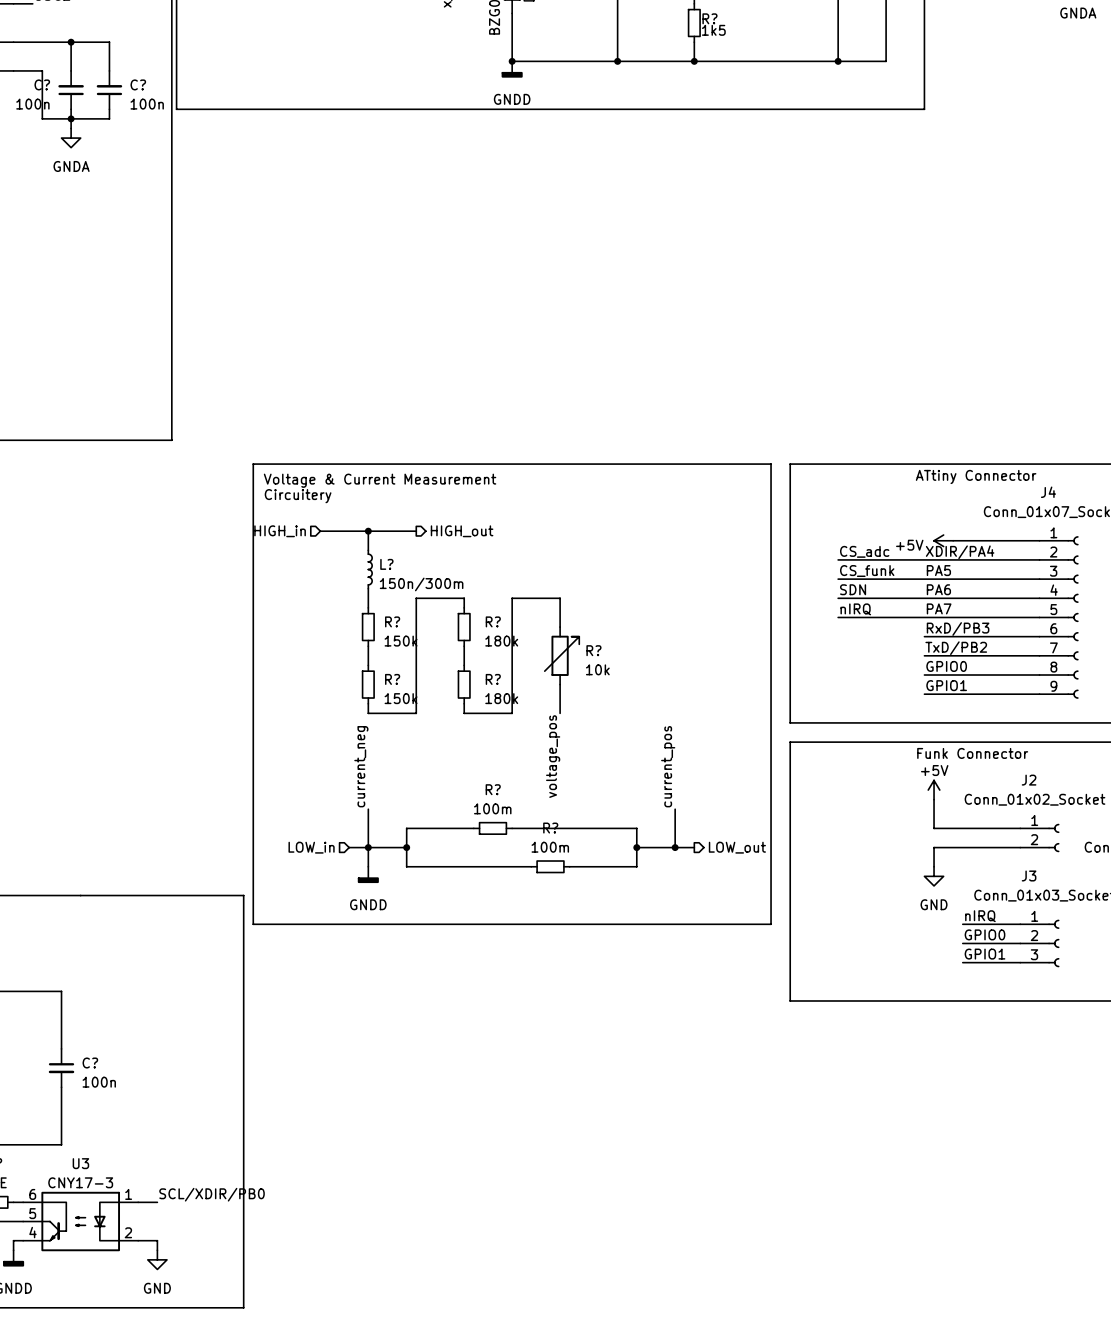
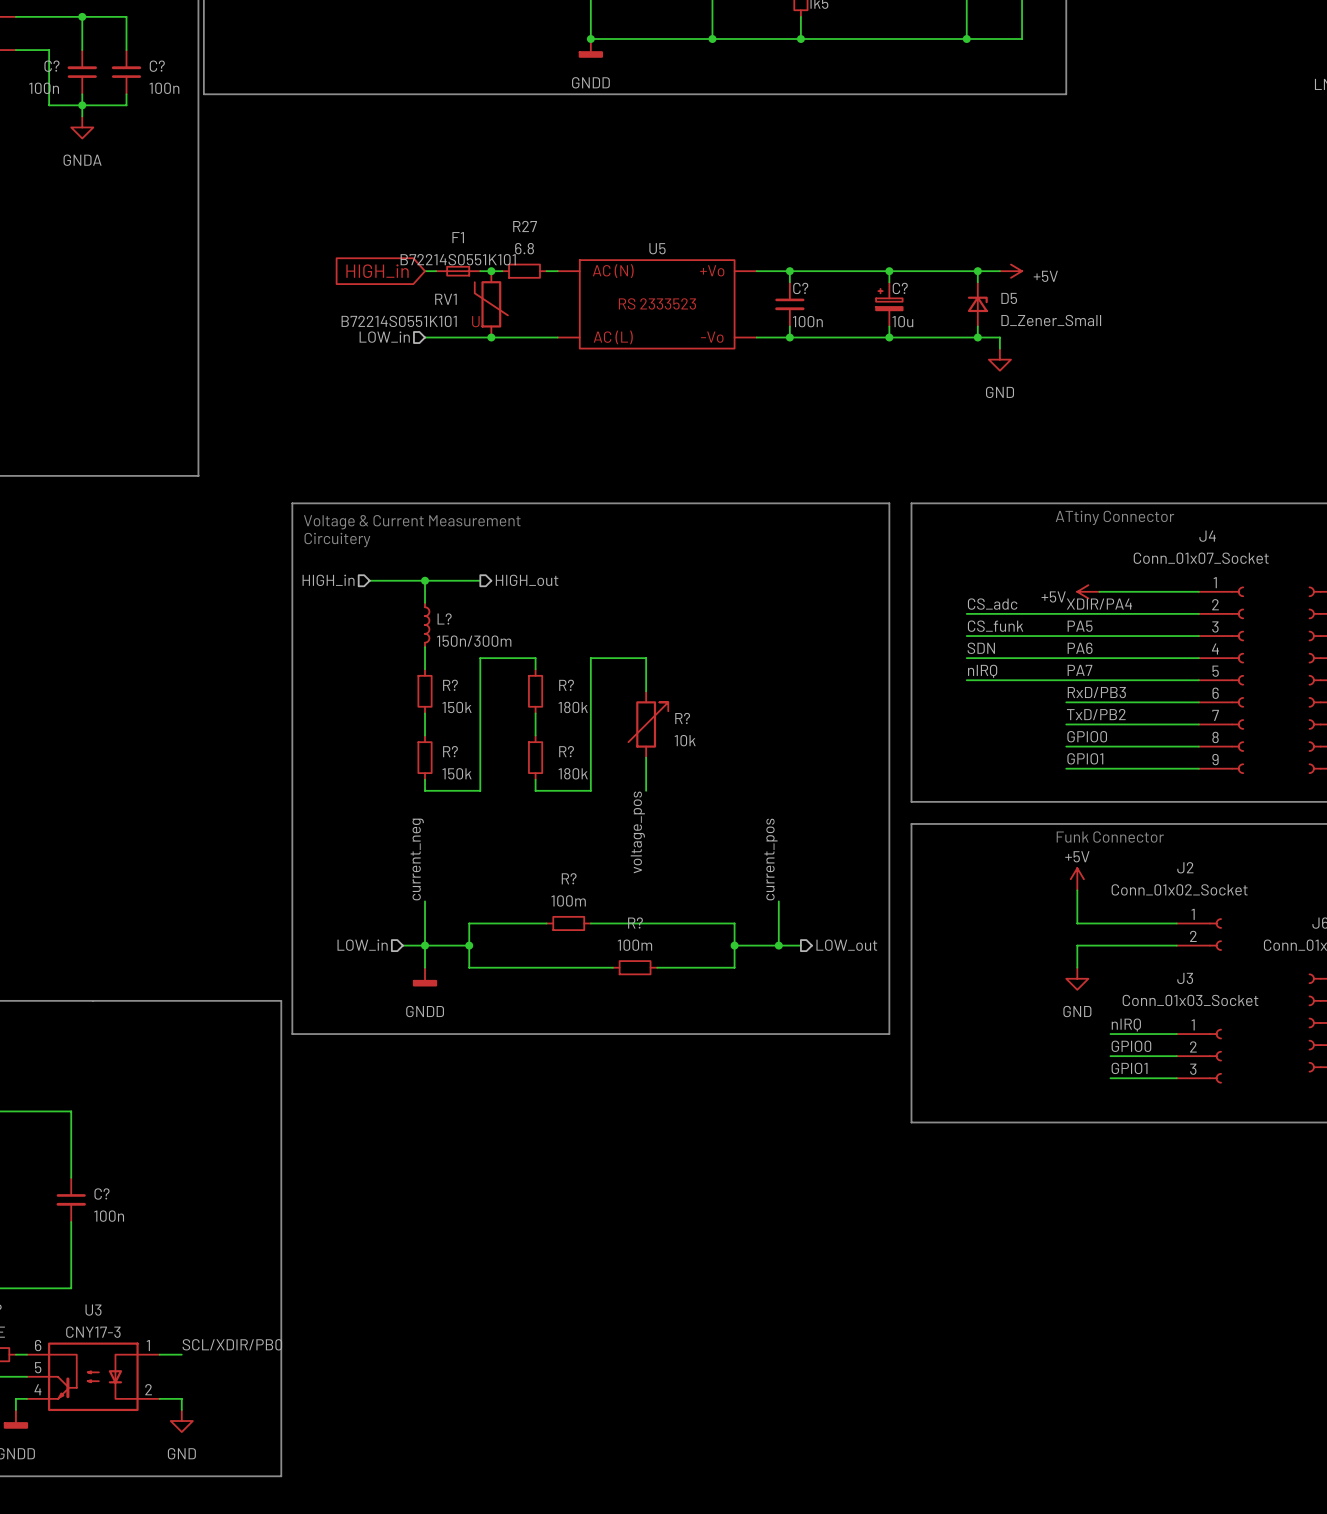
wire: none -> (425, 271) (436, 271)
F1: none -> B72214S0551K101 (458, 271)
wire: none -> (480, 271) (502, 271)
junction: none -> (491, 271)
R27: none -> 6.8 (524, 271)
wire: none -> (546, 271) (557, 271)
wire: none -> (756, 271) (999, 271)
wire: none -> (789, 271) (789, 282)
junction: none -> (789, 271)
wire: none -> (889, 271) (889, 282)
junction: none -> (889, 271)
wire: none -> (977, 271) (977, 282)
junction: none -> (977, 271)
power symbol: none -> +5V (1010, 271)
global label: none -> HIGH_in (377, 271)
RV1: none -> B72214S0551K101 (491, 304)
U5: none -> (657, 304)
C?: none -> 100n (789, 304)
C?: none -> 10u (889, 304)
D5: none -> D_Zener_Small (977, 304)
wire: none -> (789, 326) (789, 337)
wire: none -> (889, 326) (889, 337)
wire: none -> (977, 326) (977, 337)
hierarchical label: none -> LOW_in (384, 337)
wire: none -> (425, 337) (557, 337)
junction: none -> (491, 337)
wire: none -> (756, 337) (999, 337) (999, 348)
junction: none -> (789, 337)
junction: none -> (889, 337)
junction: none -> (977, 337)
power symbol: none -> GND (999, 359)

